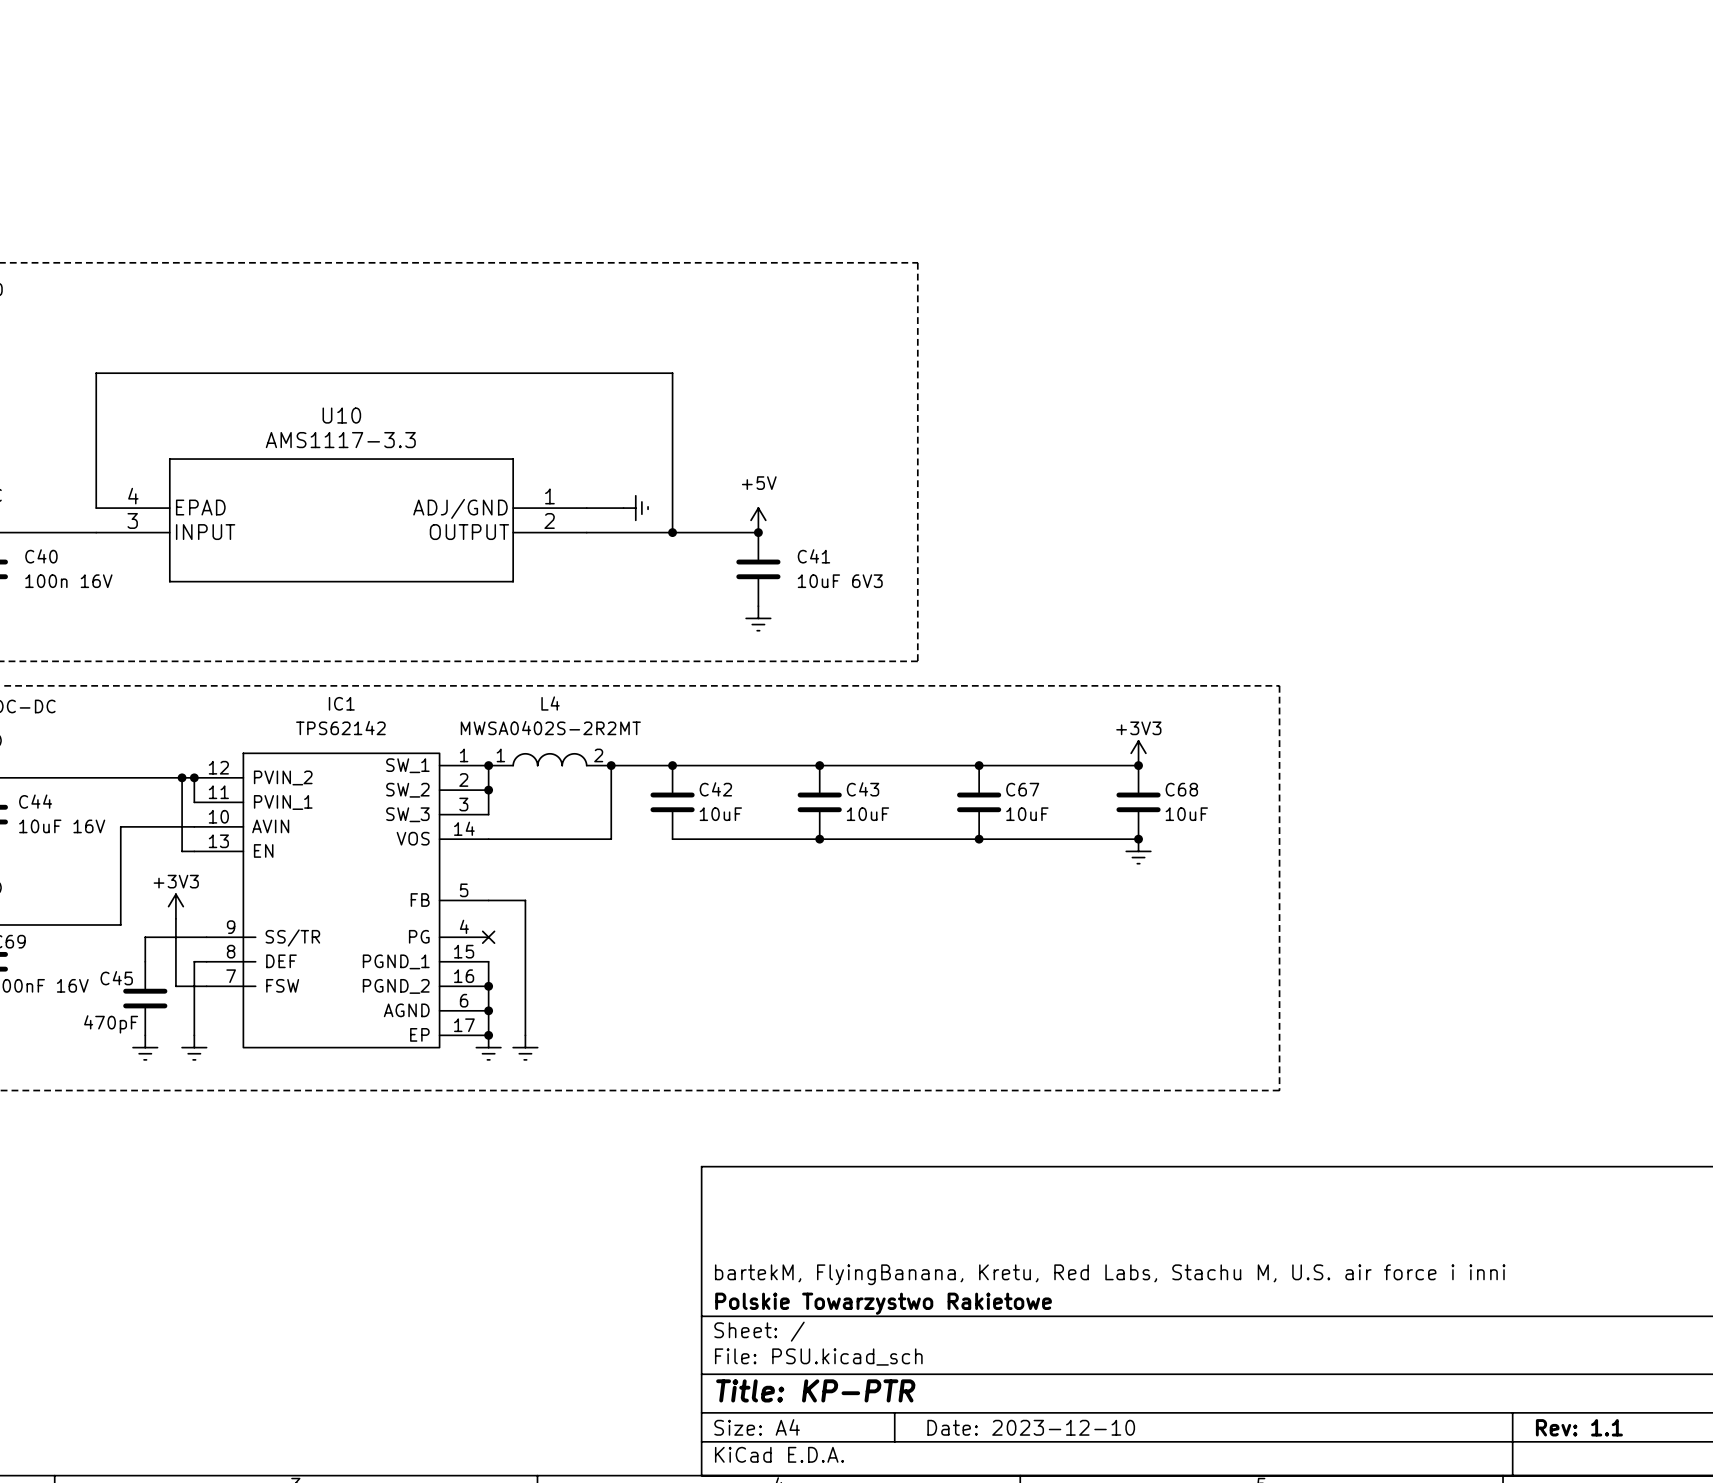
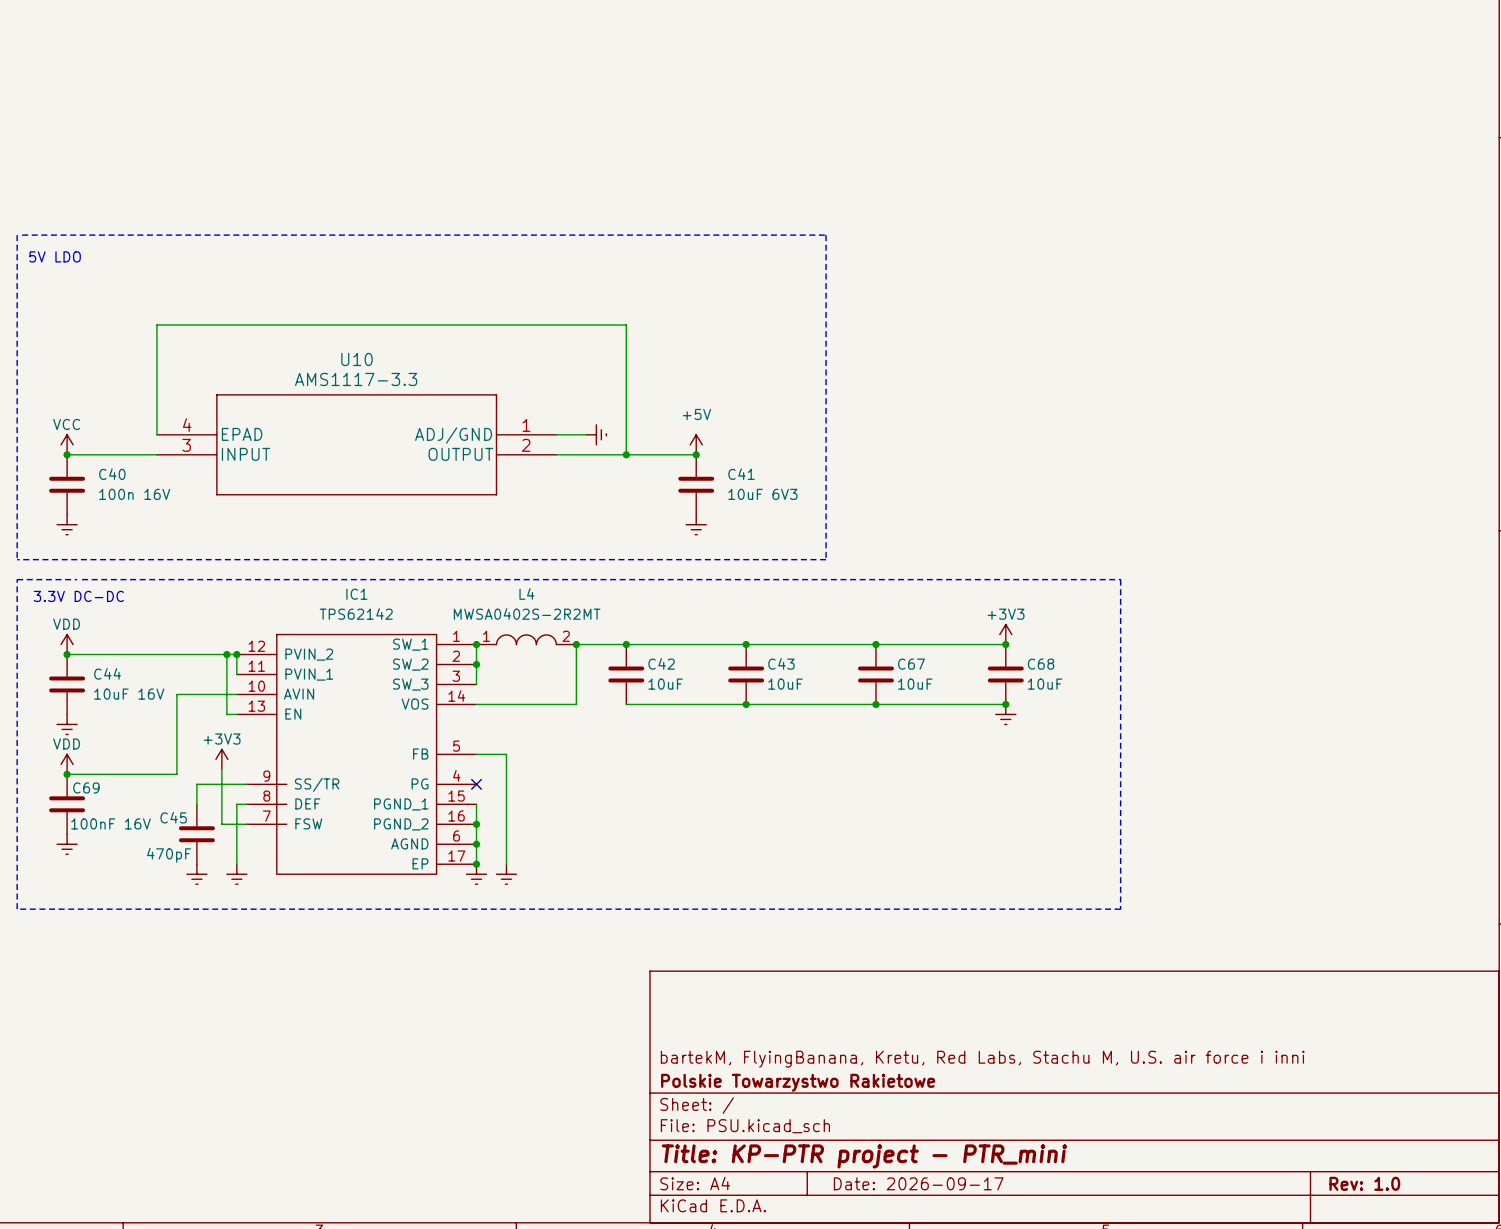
title block: Title: KP-PTR (815, 1390) -> Title: KP-PTR project - PTR_mini (864, 1156)
title block: Date: 2023-12-10 (1031, 1427) -> Date: 2026-09-17 (918, 1183)
title block: Rev: 1.1 (1579, 1427) -> Rev: 1.0 (1364, 1183)

